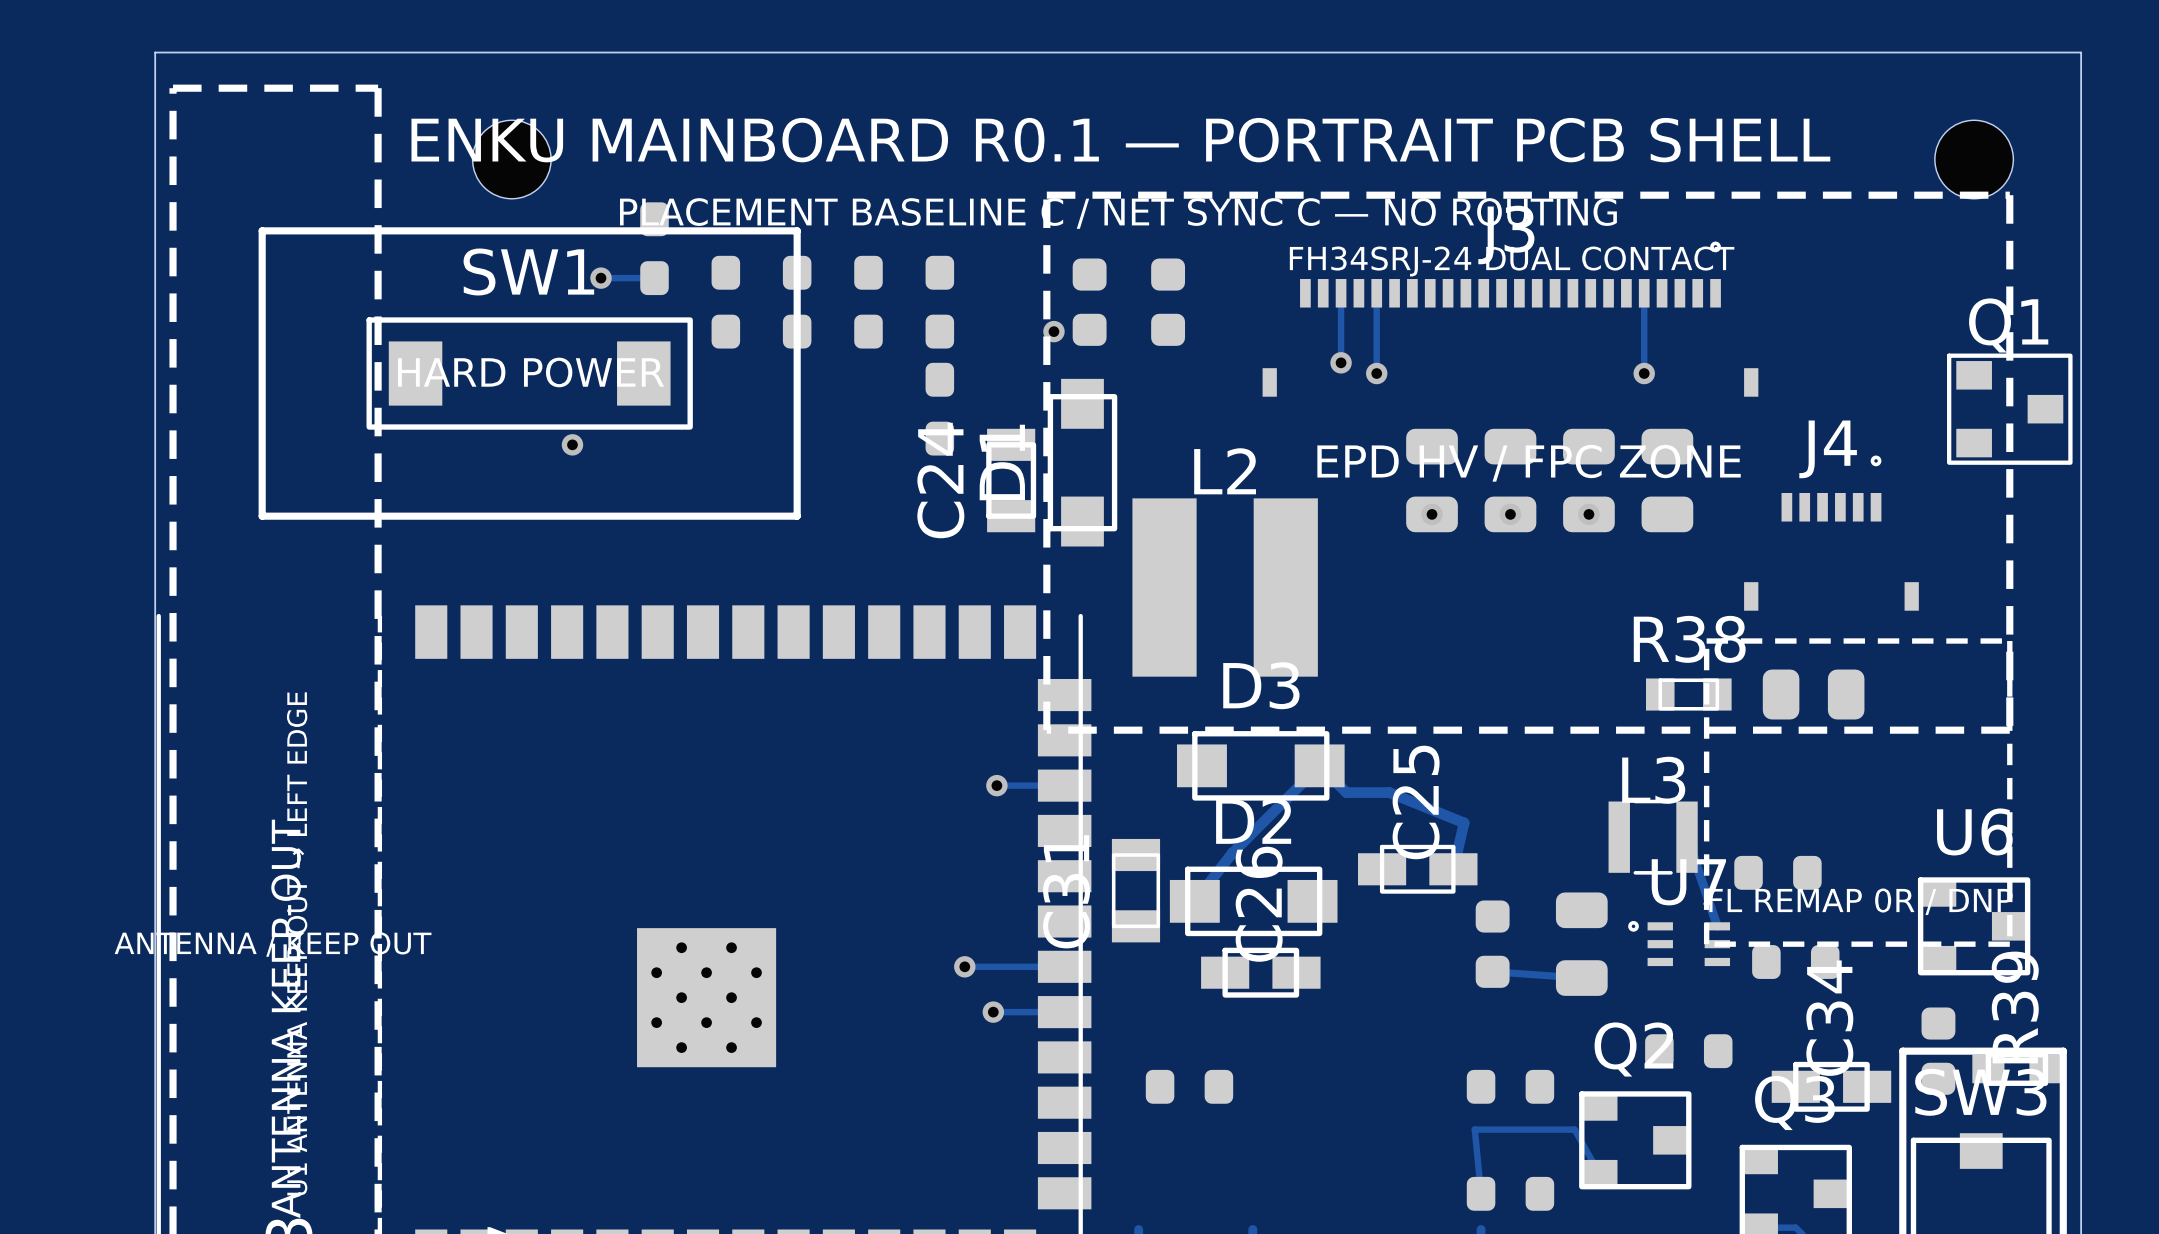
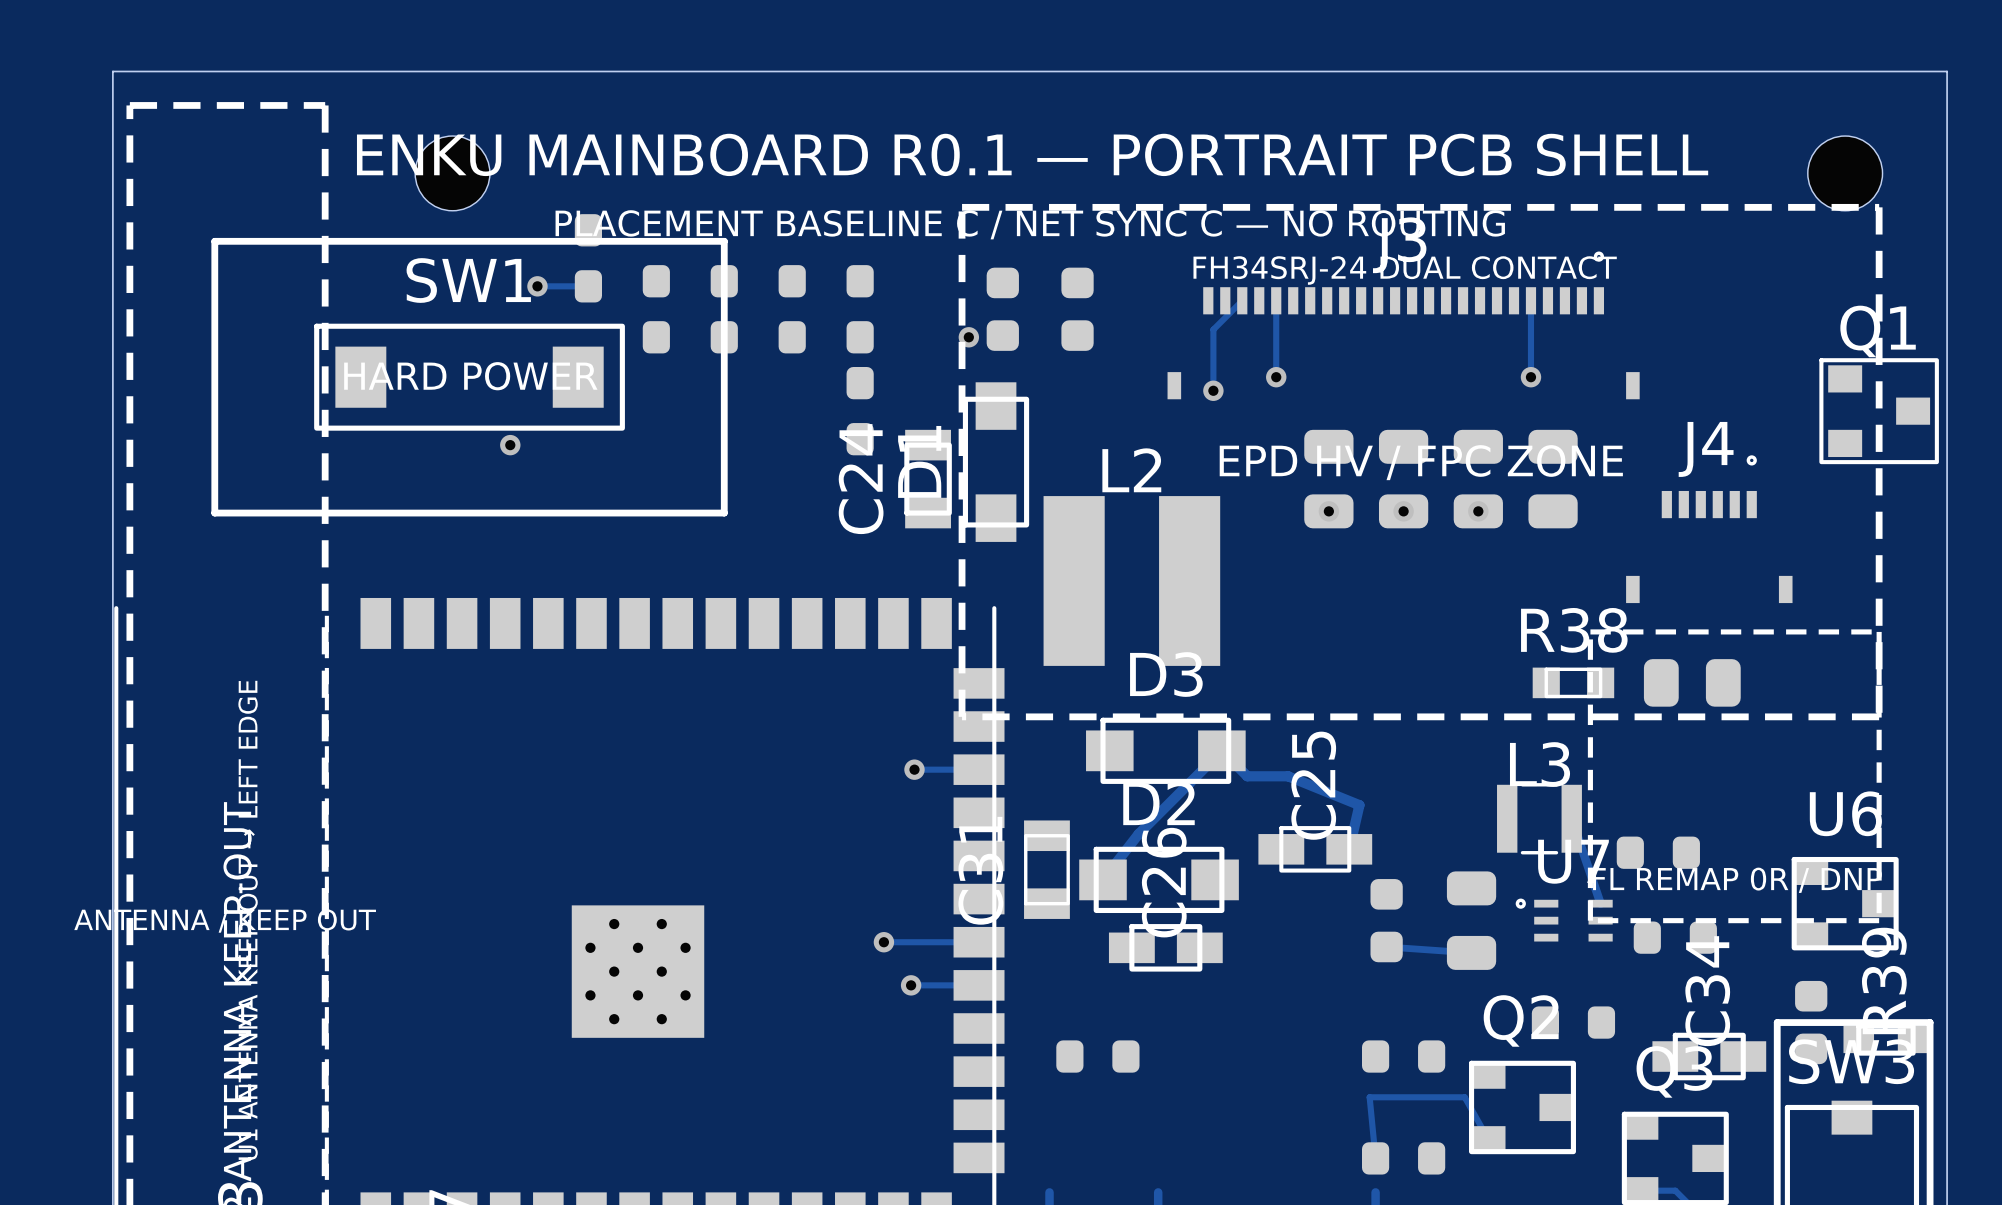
track: (1341, 293) (1341, 362) -> (1242, 300) (1213, 329) (1213, 390)
via position: (1341, 362) -> (1213, 390)

